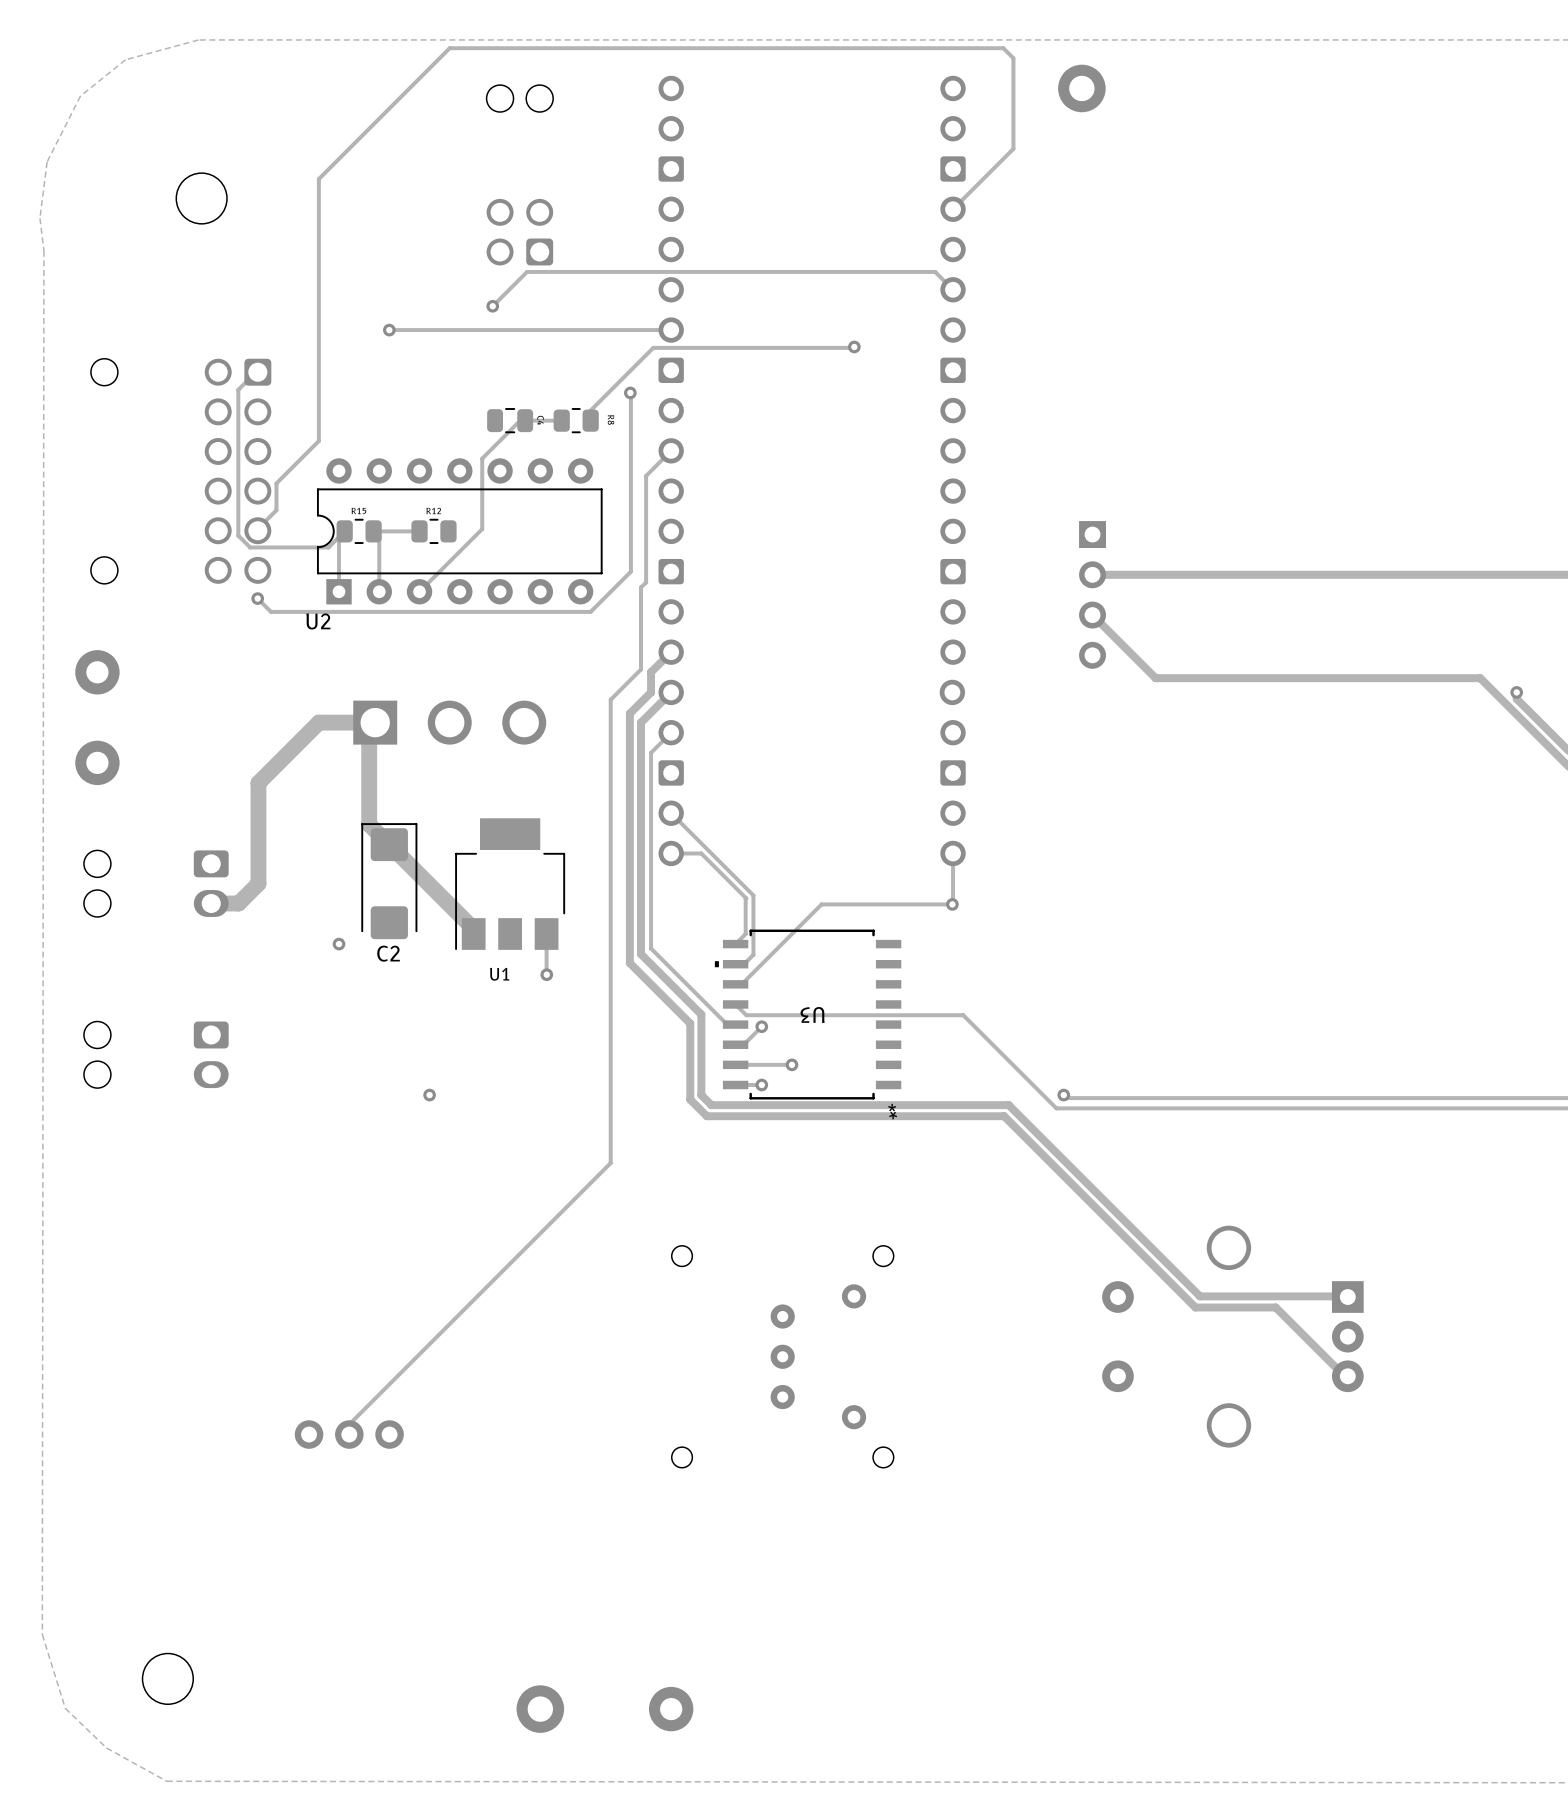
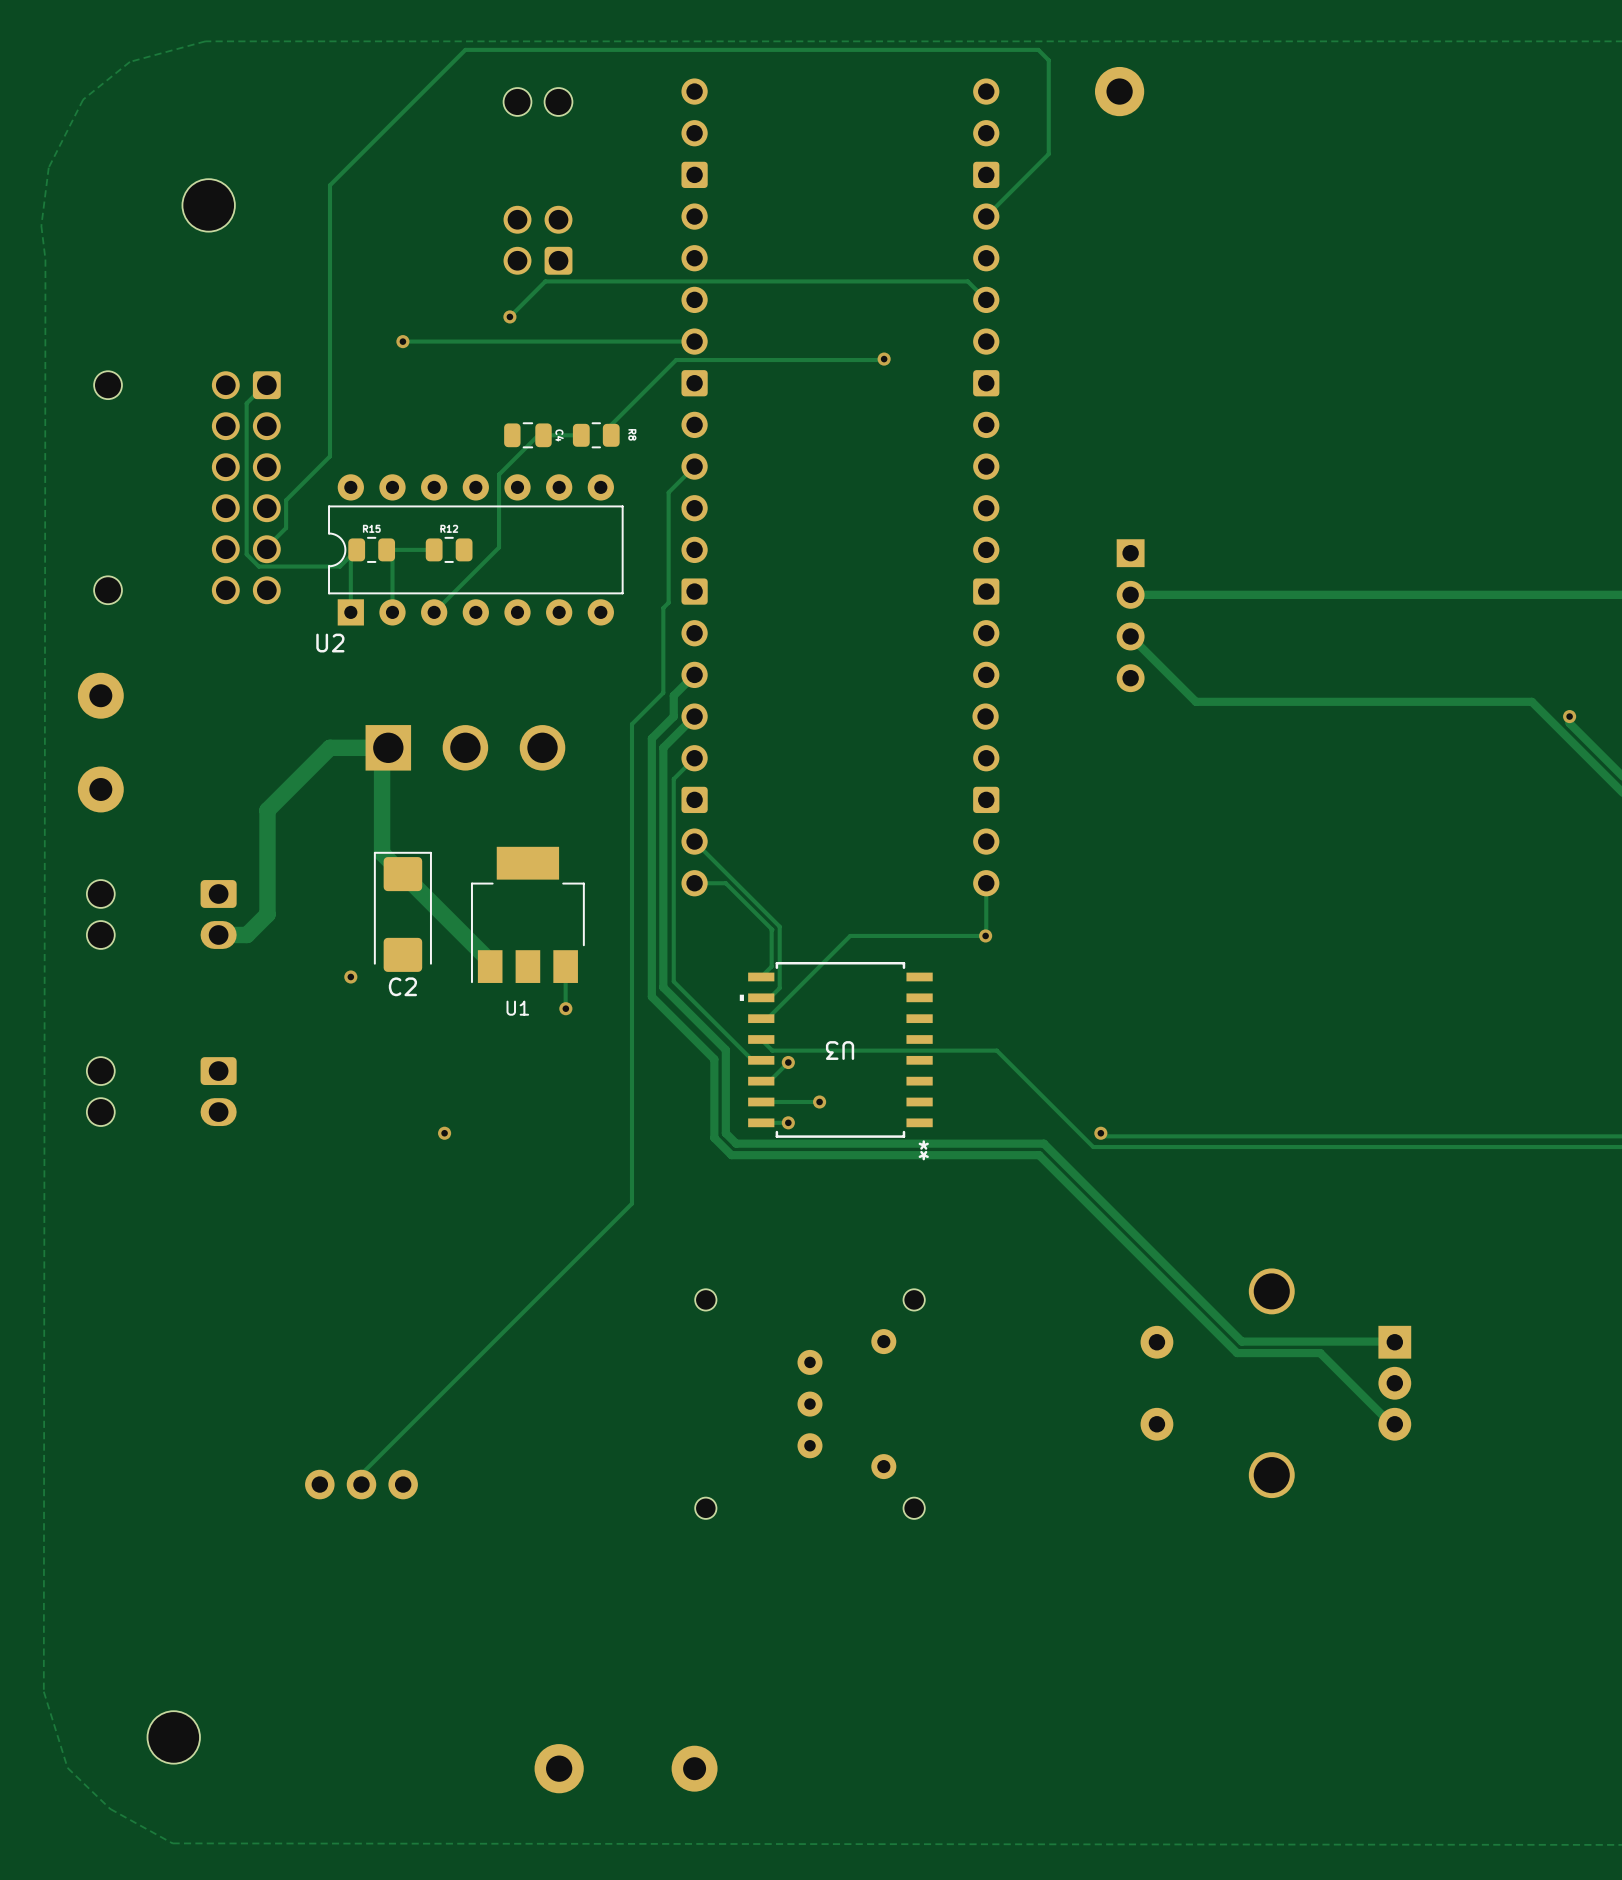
track: (630, 392) (630, 571) (590, 611) (271, 611) (257, 598) -> none
via: (630, 392) -> none
via: (257, 598) -> none

